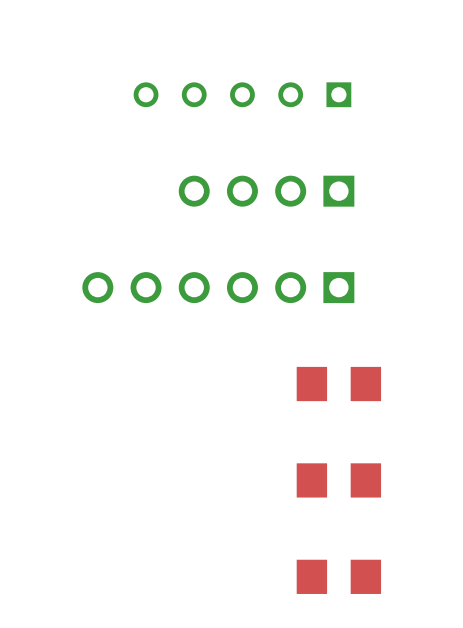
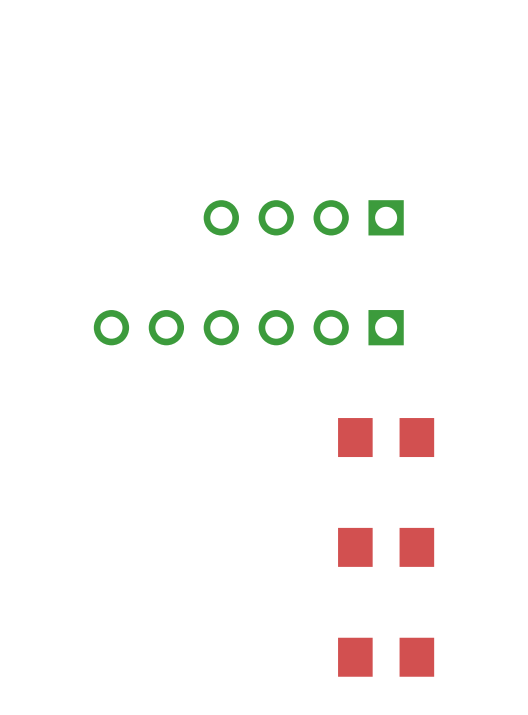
part: (242, 94) -> none

